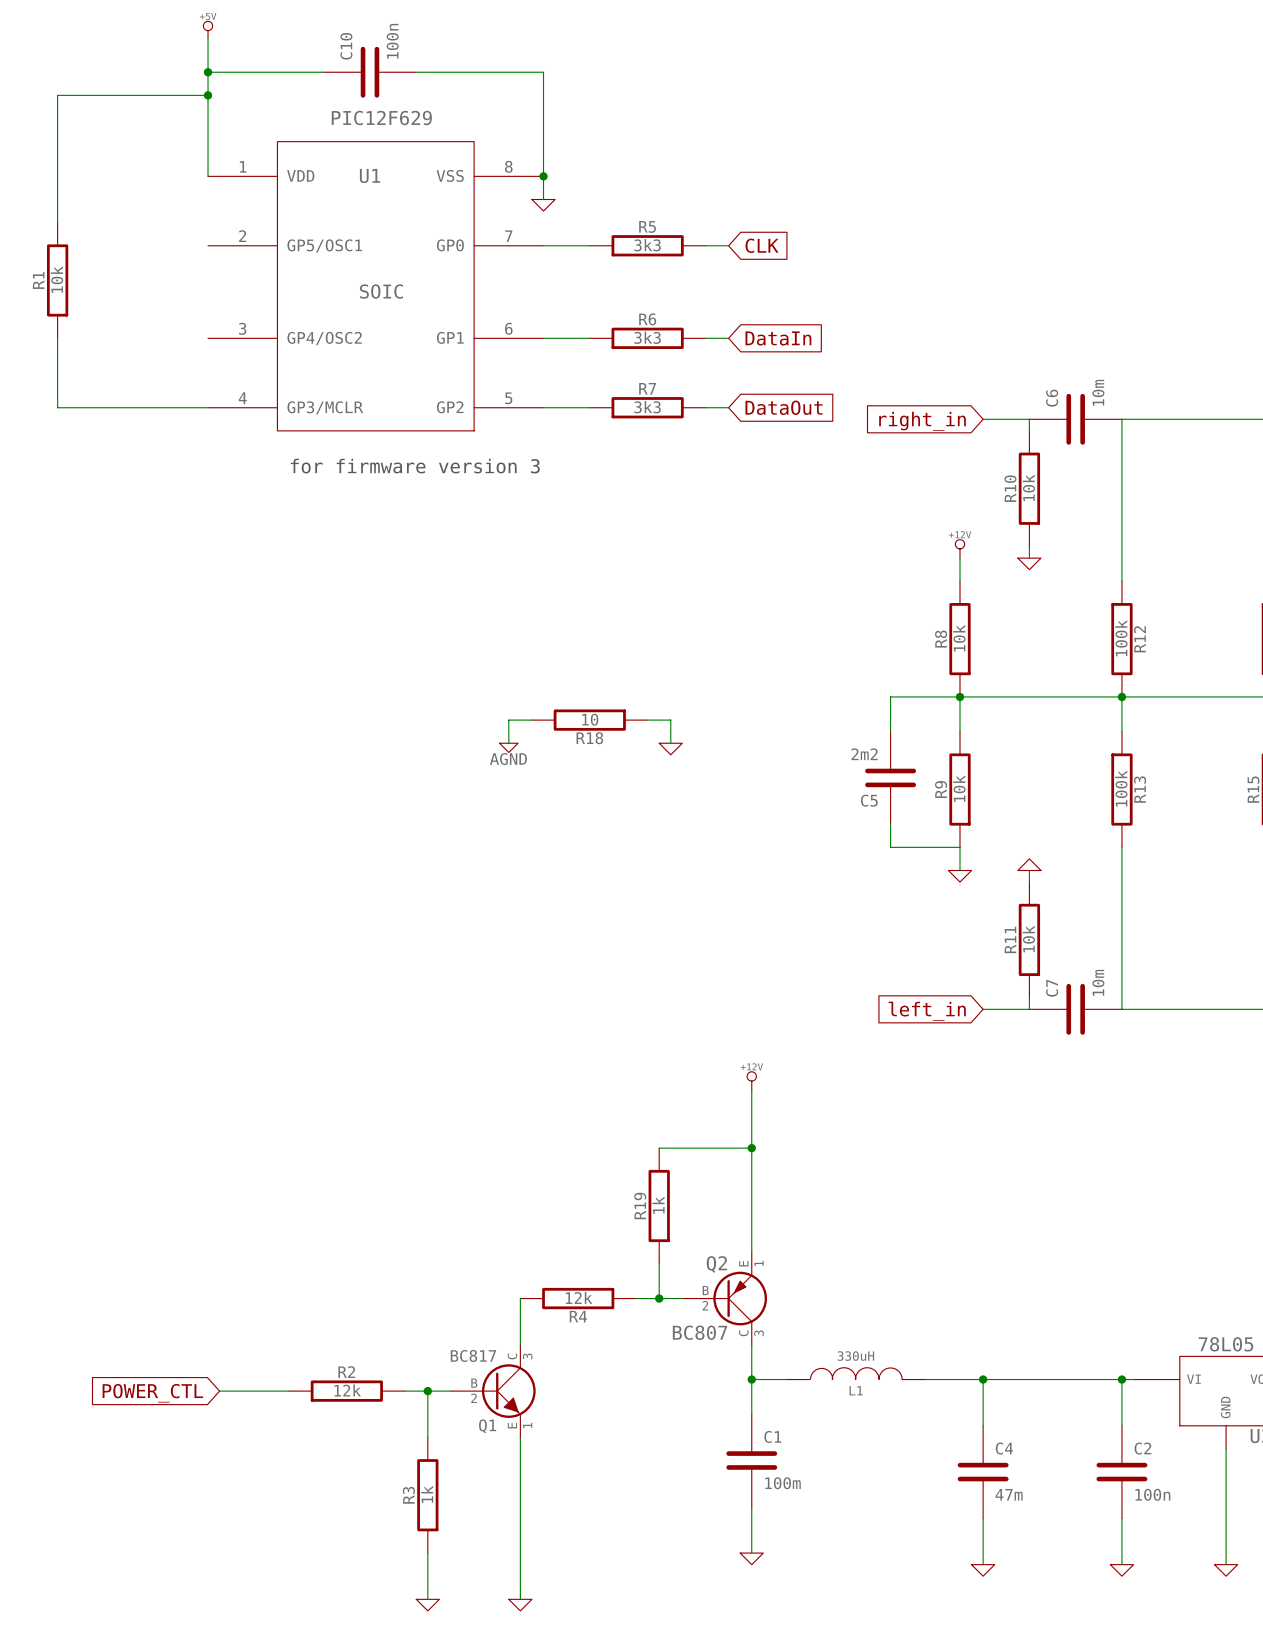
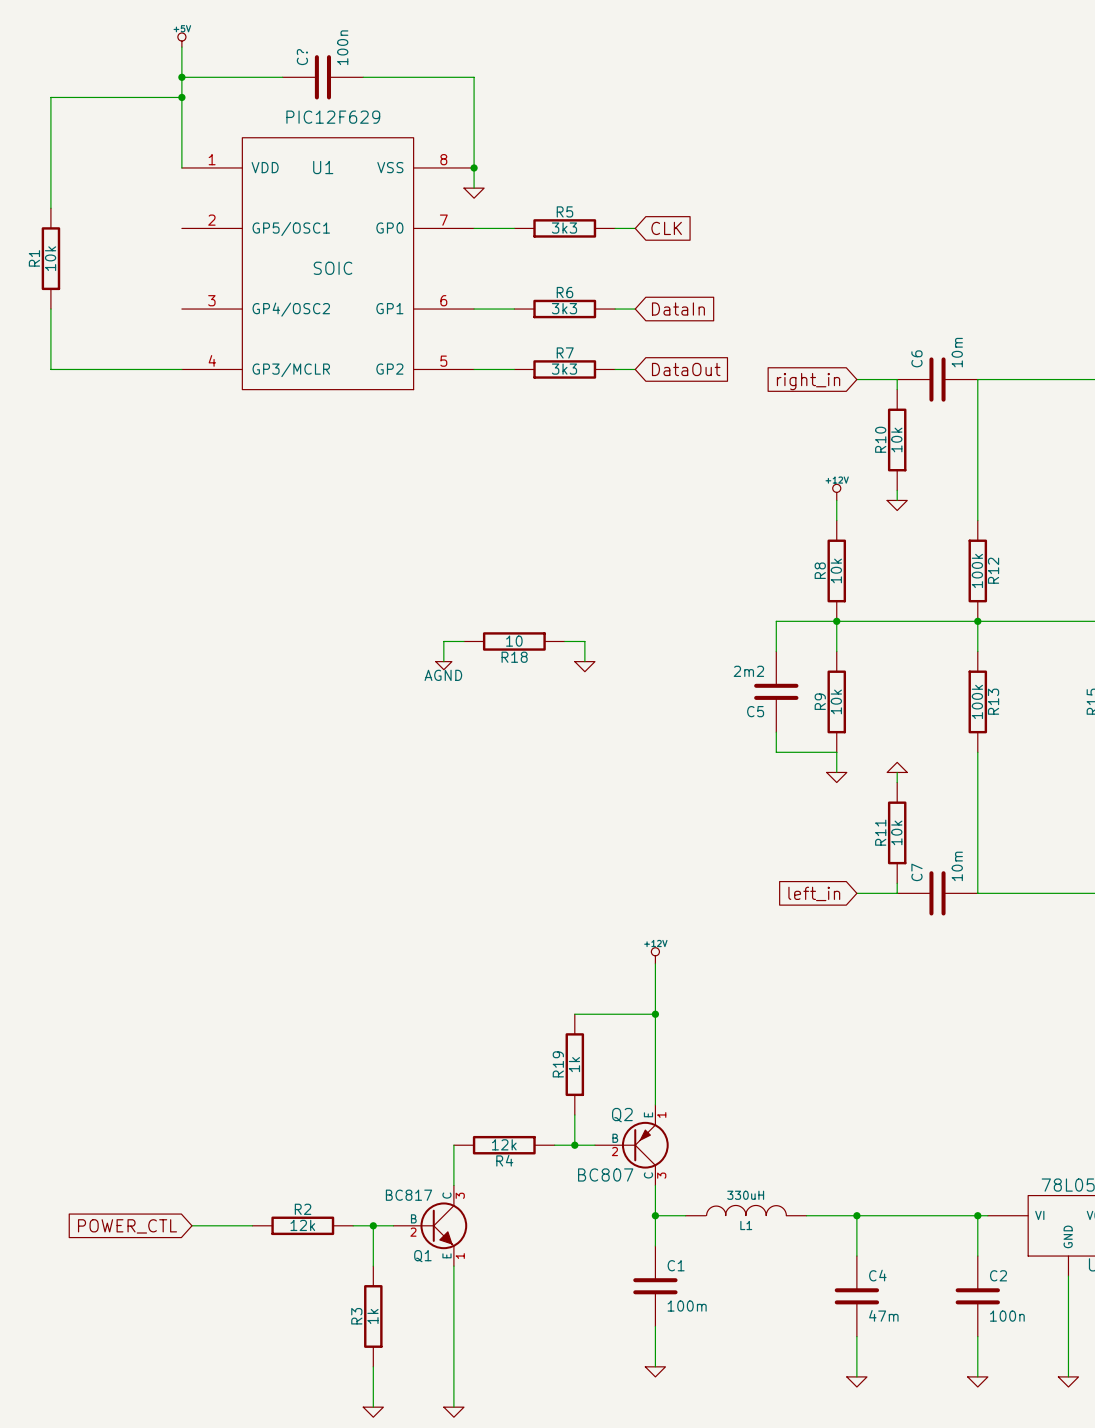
C10 name: C10 (346, 46) -> C? (302, 57)
text: for firmware version 3 (415, 466) -> none

